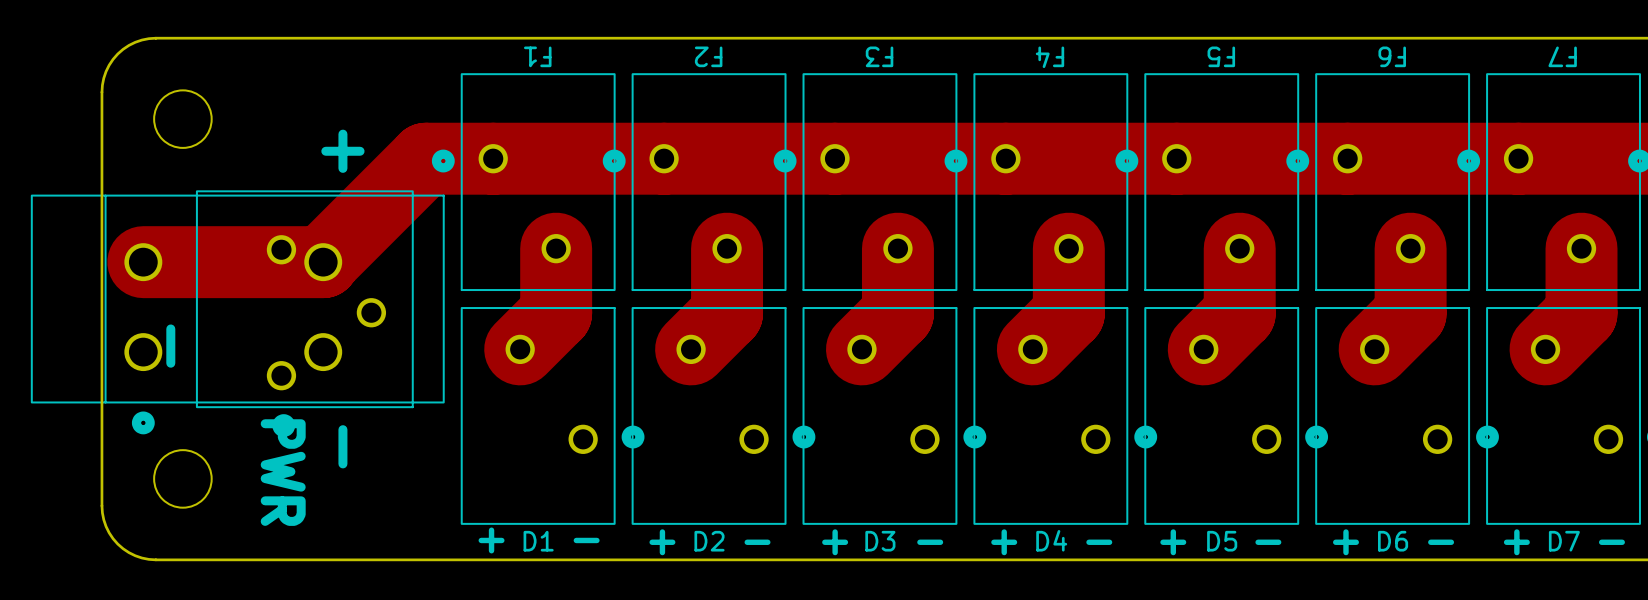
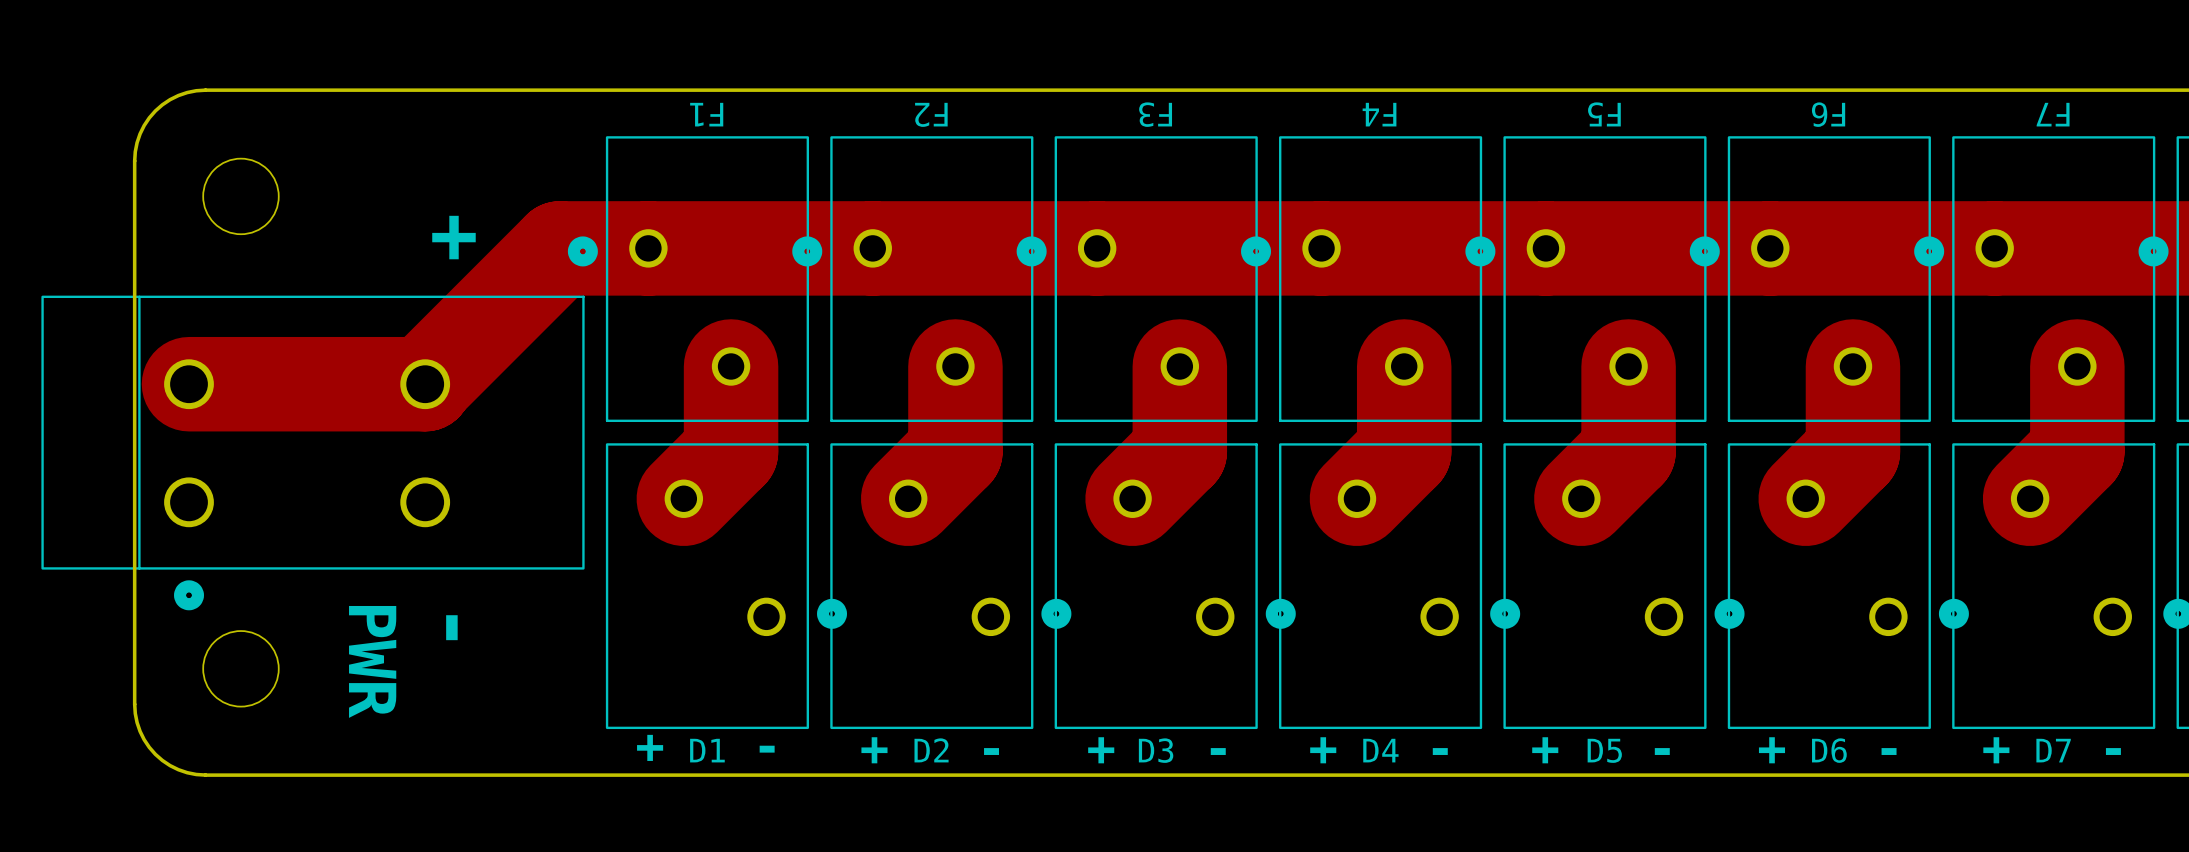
part: (304, 313) -> none
text: - (170, 346) -> none

